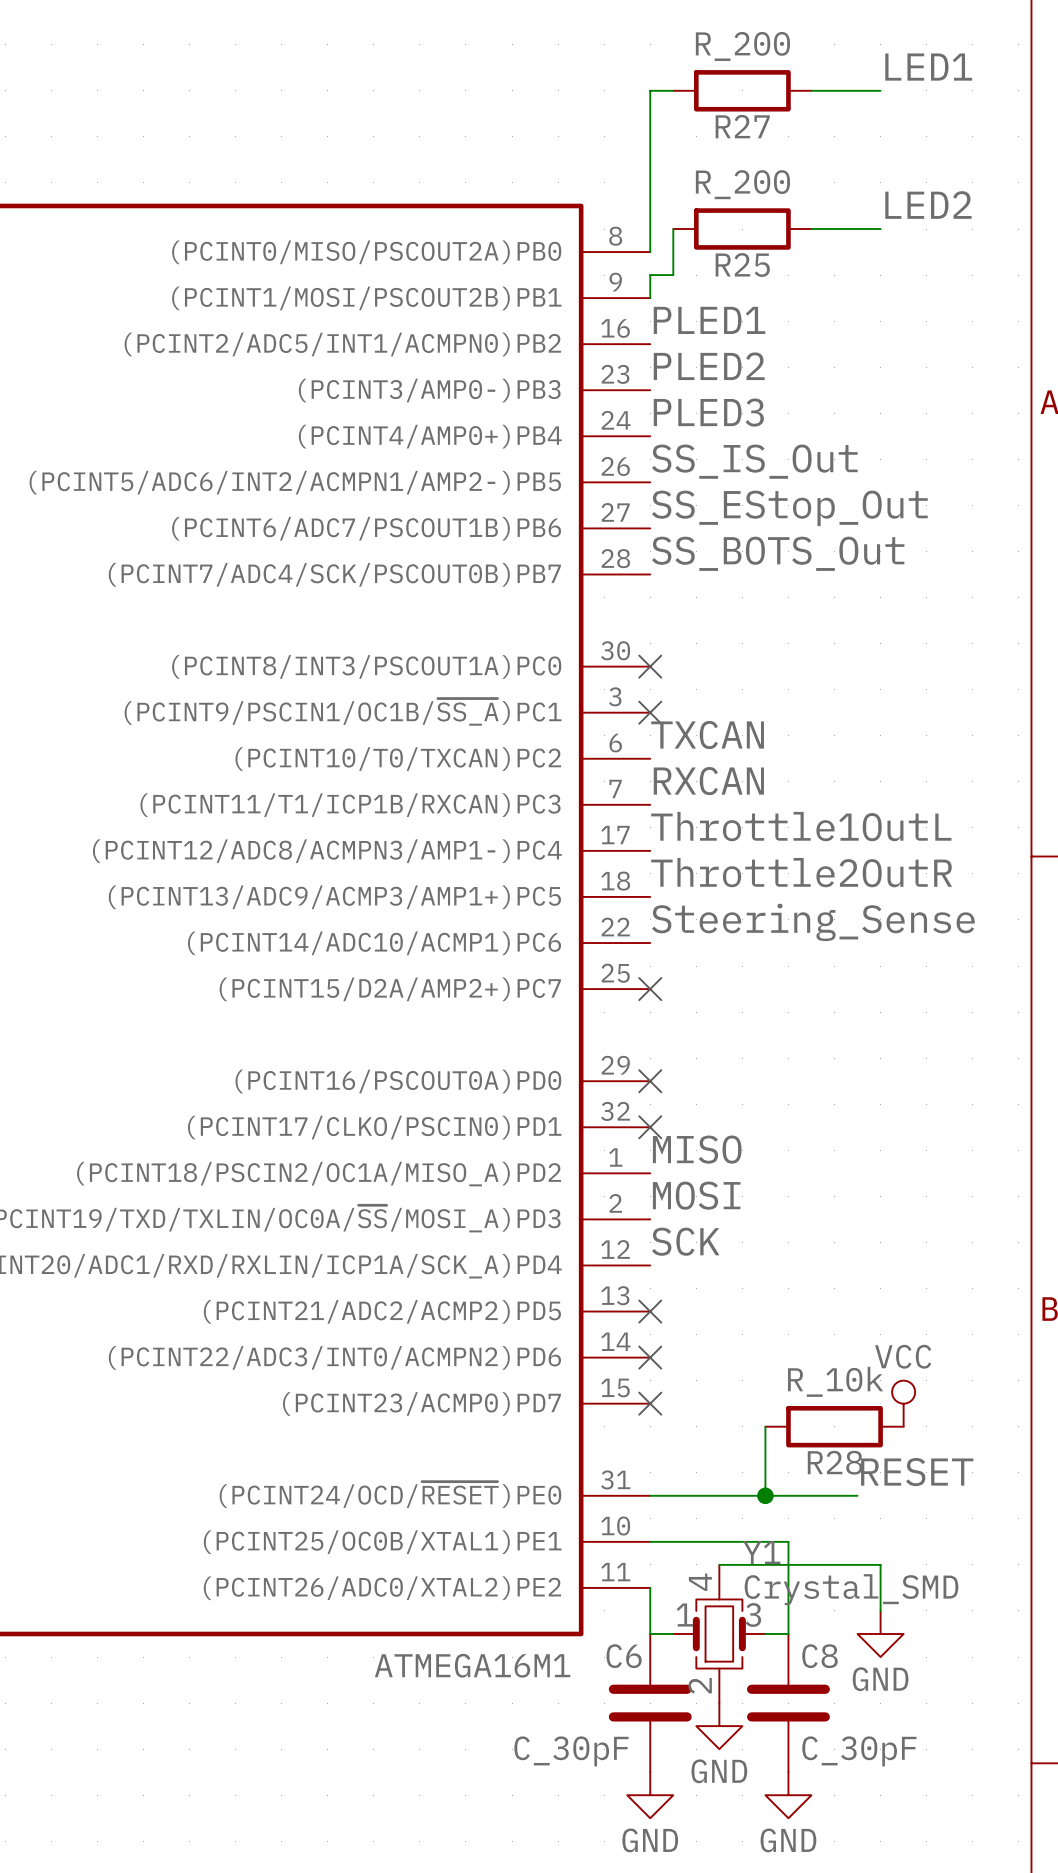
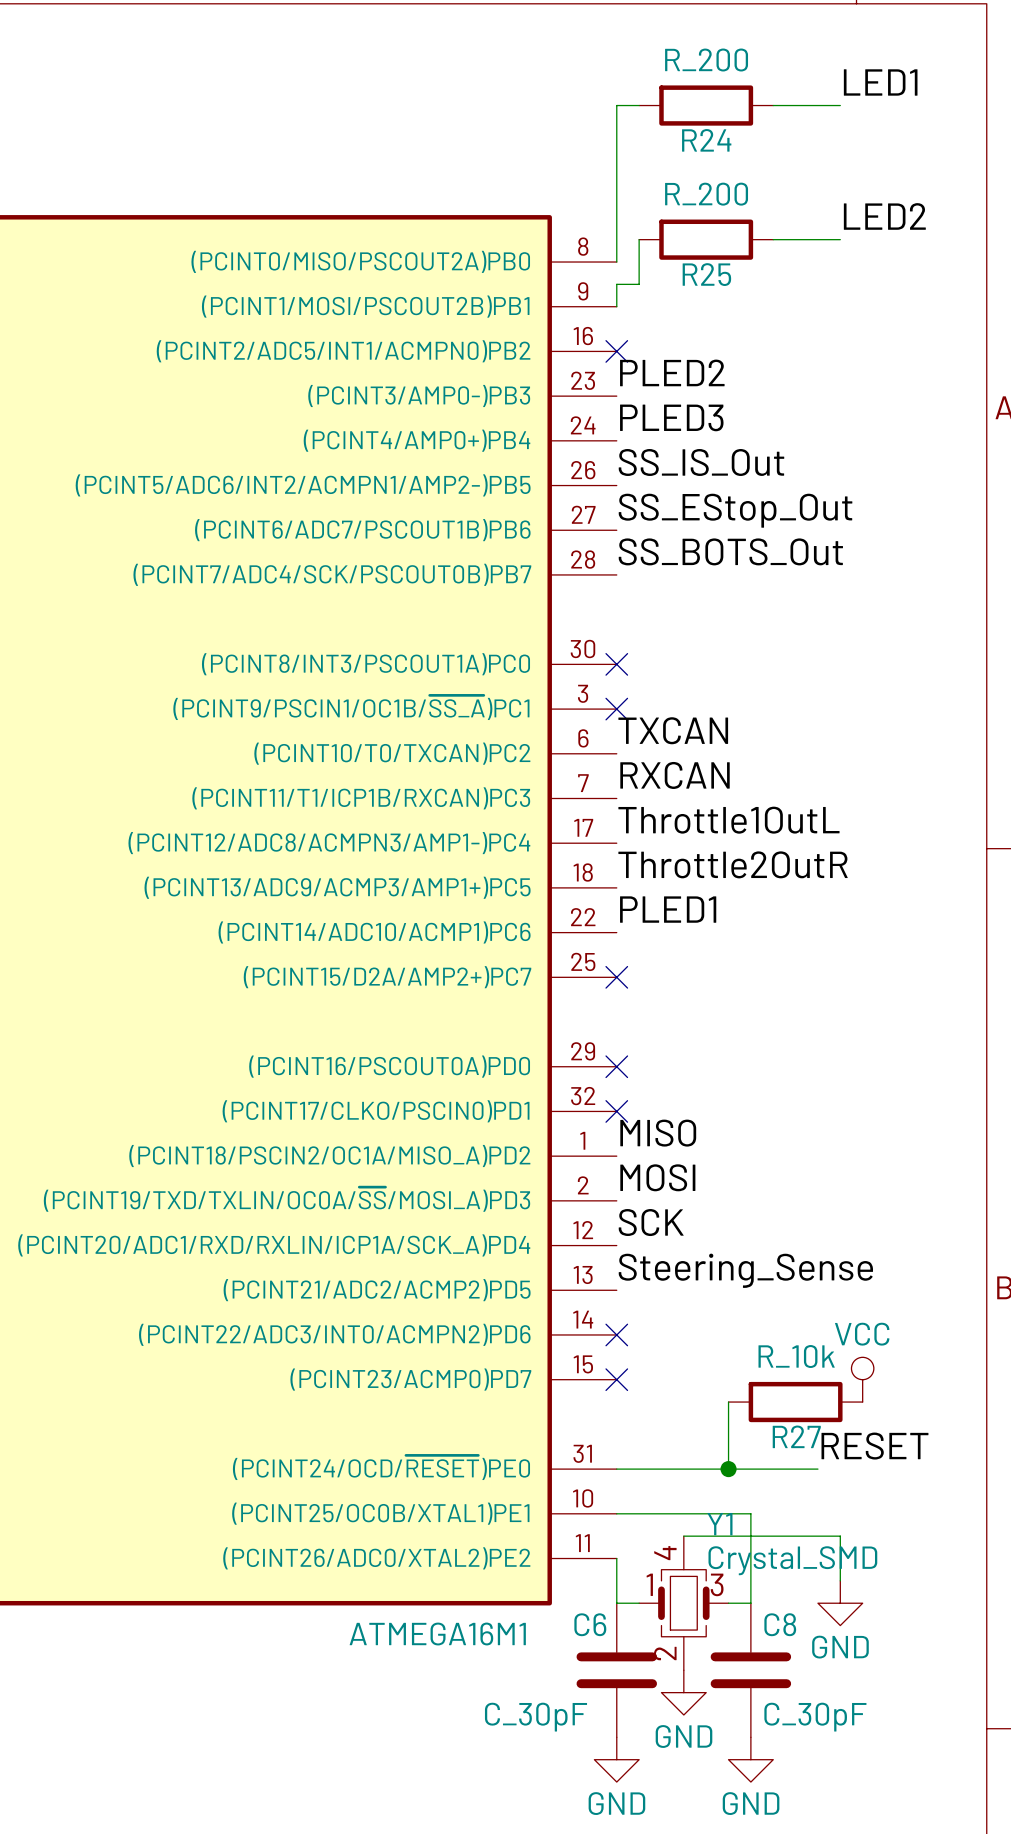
R27 name: R27 (742, 126) -> R24 (706, 140)
label: PLED1 (709, 320) -> none
no-connect mark: none -> (616, 351)
label: Steering_Sense (813, 922) -> PLED1 (668, 909)
label: none -> Steering_Sense (745, 1270)
no-connect mark: (650, 1311) -> none
R28 name: R28 (835, 1462) -> R27 (796, 1436)

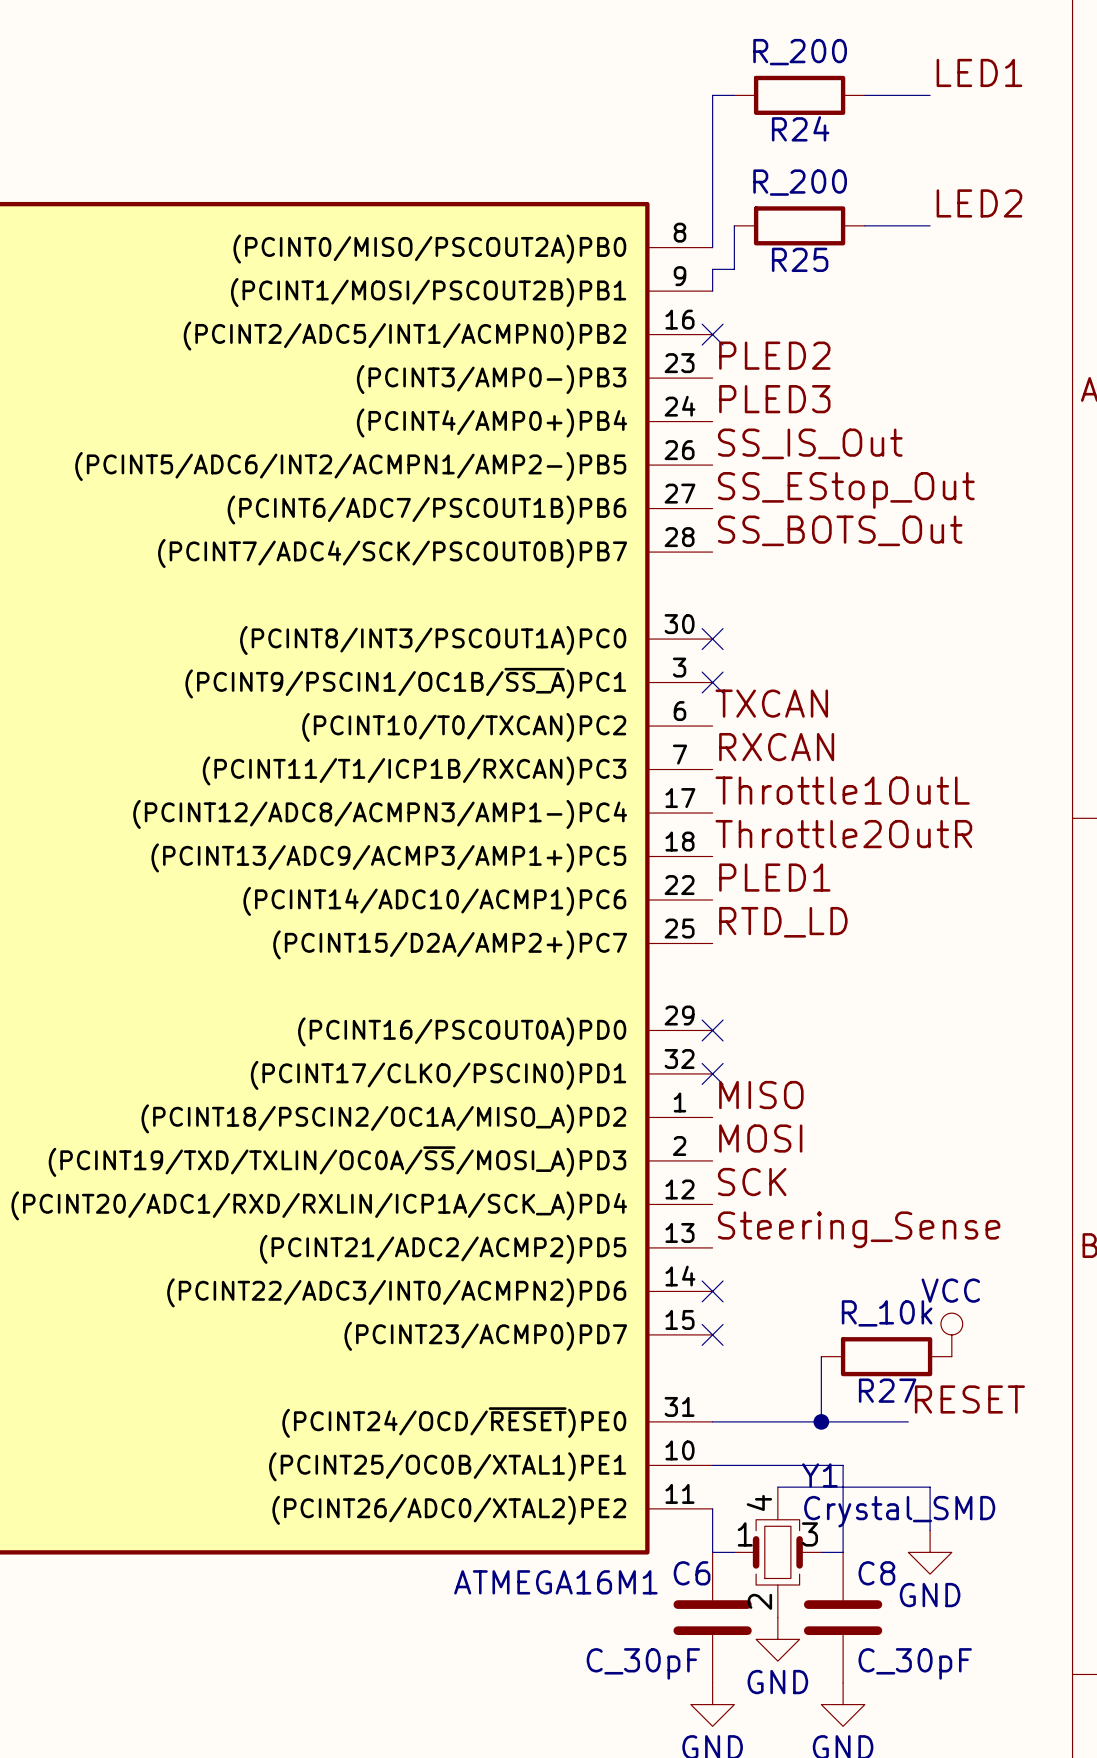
label: none -> RTD_LD (783, 922)
no-connect mark: (616, 977) -> none

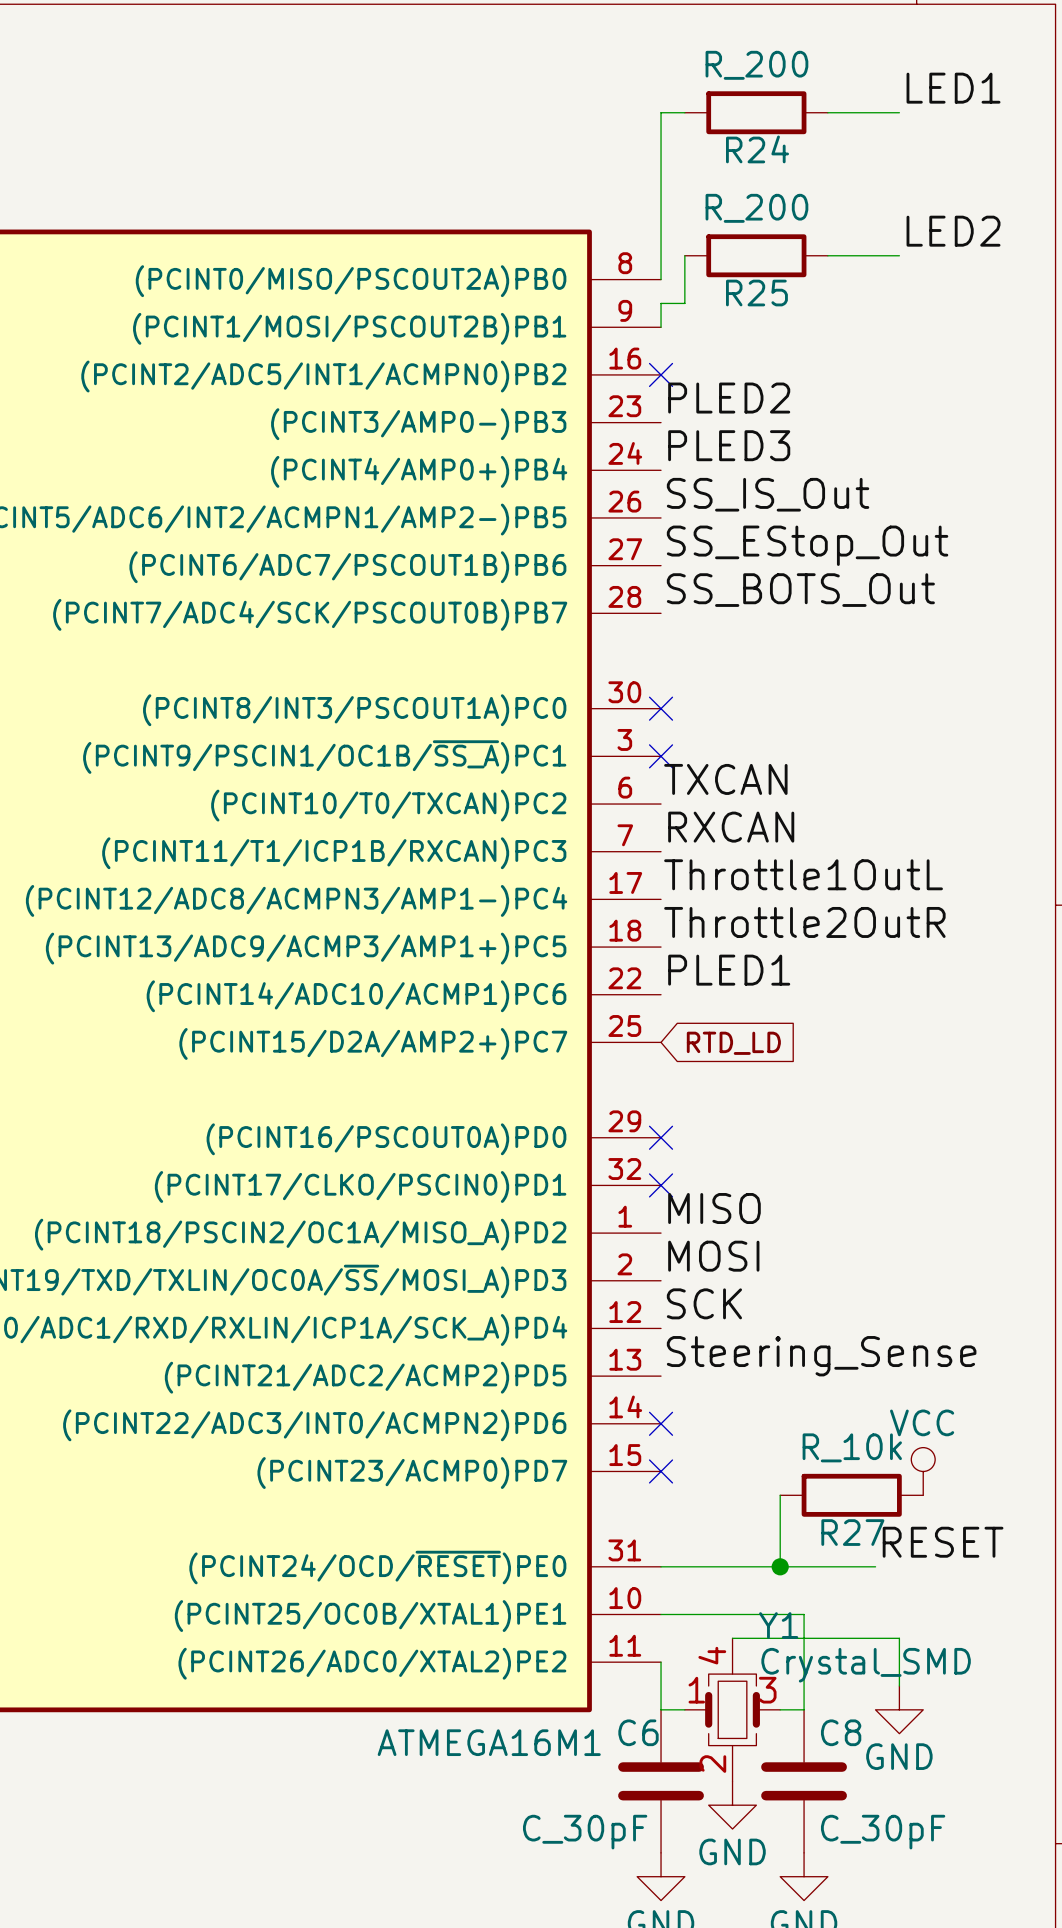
label: RTD_LD (783, 922) -> none
global label: none -> RTD_LD (733, 1043)

